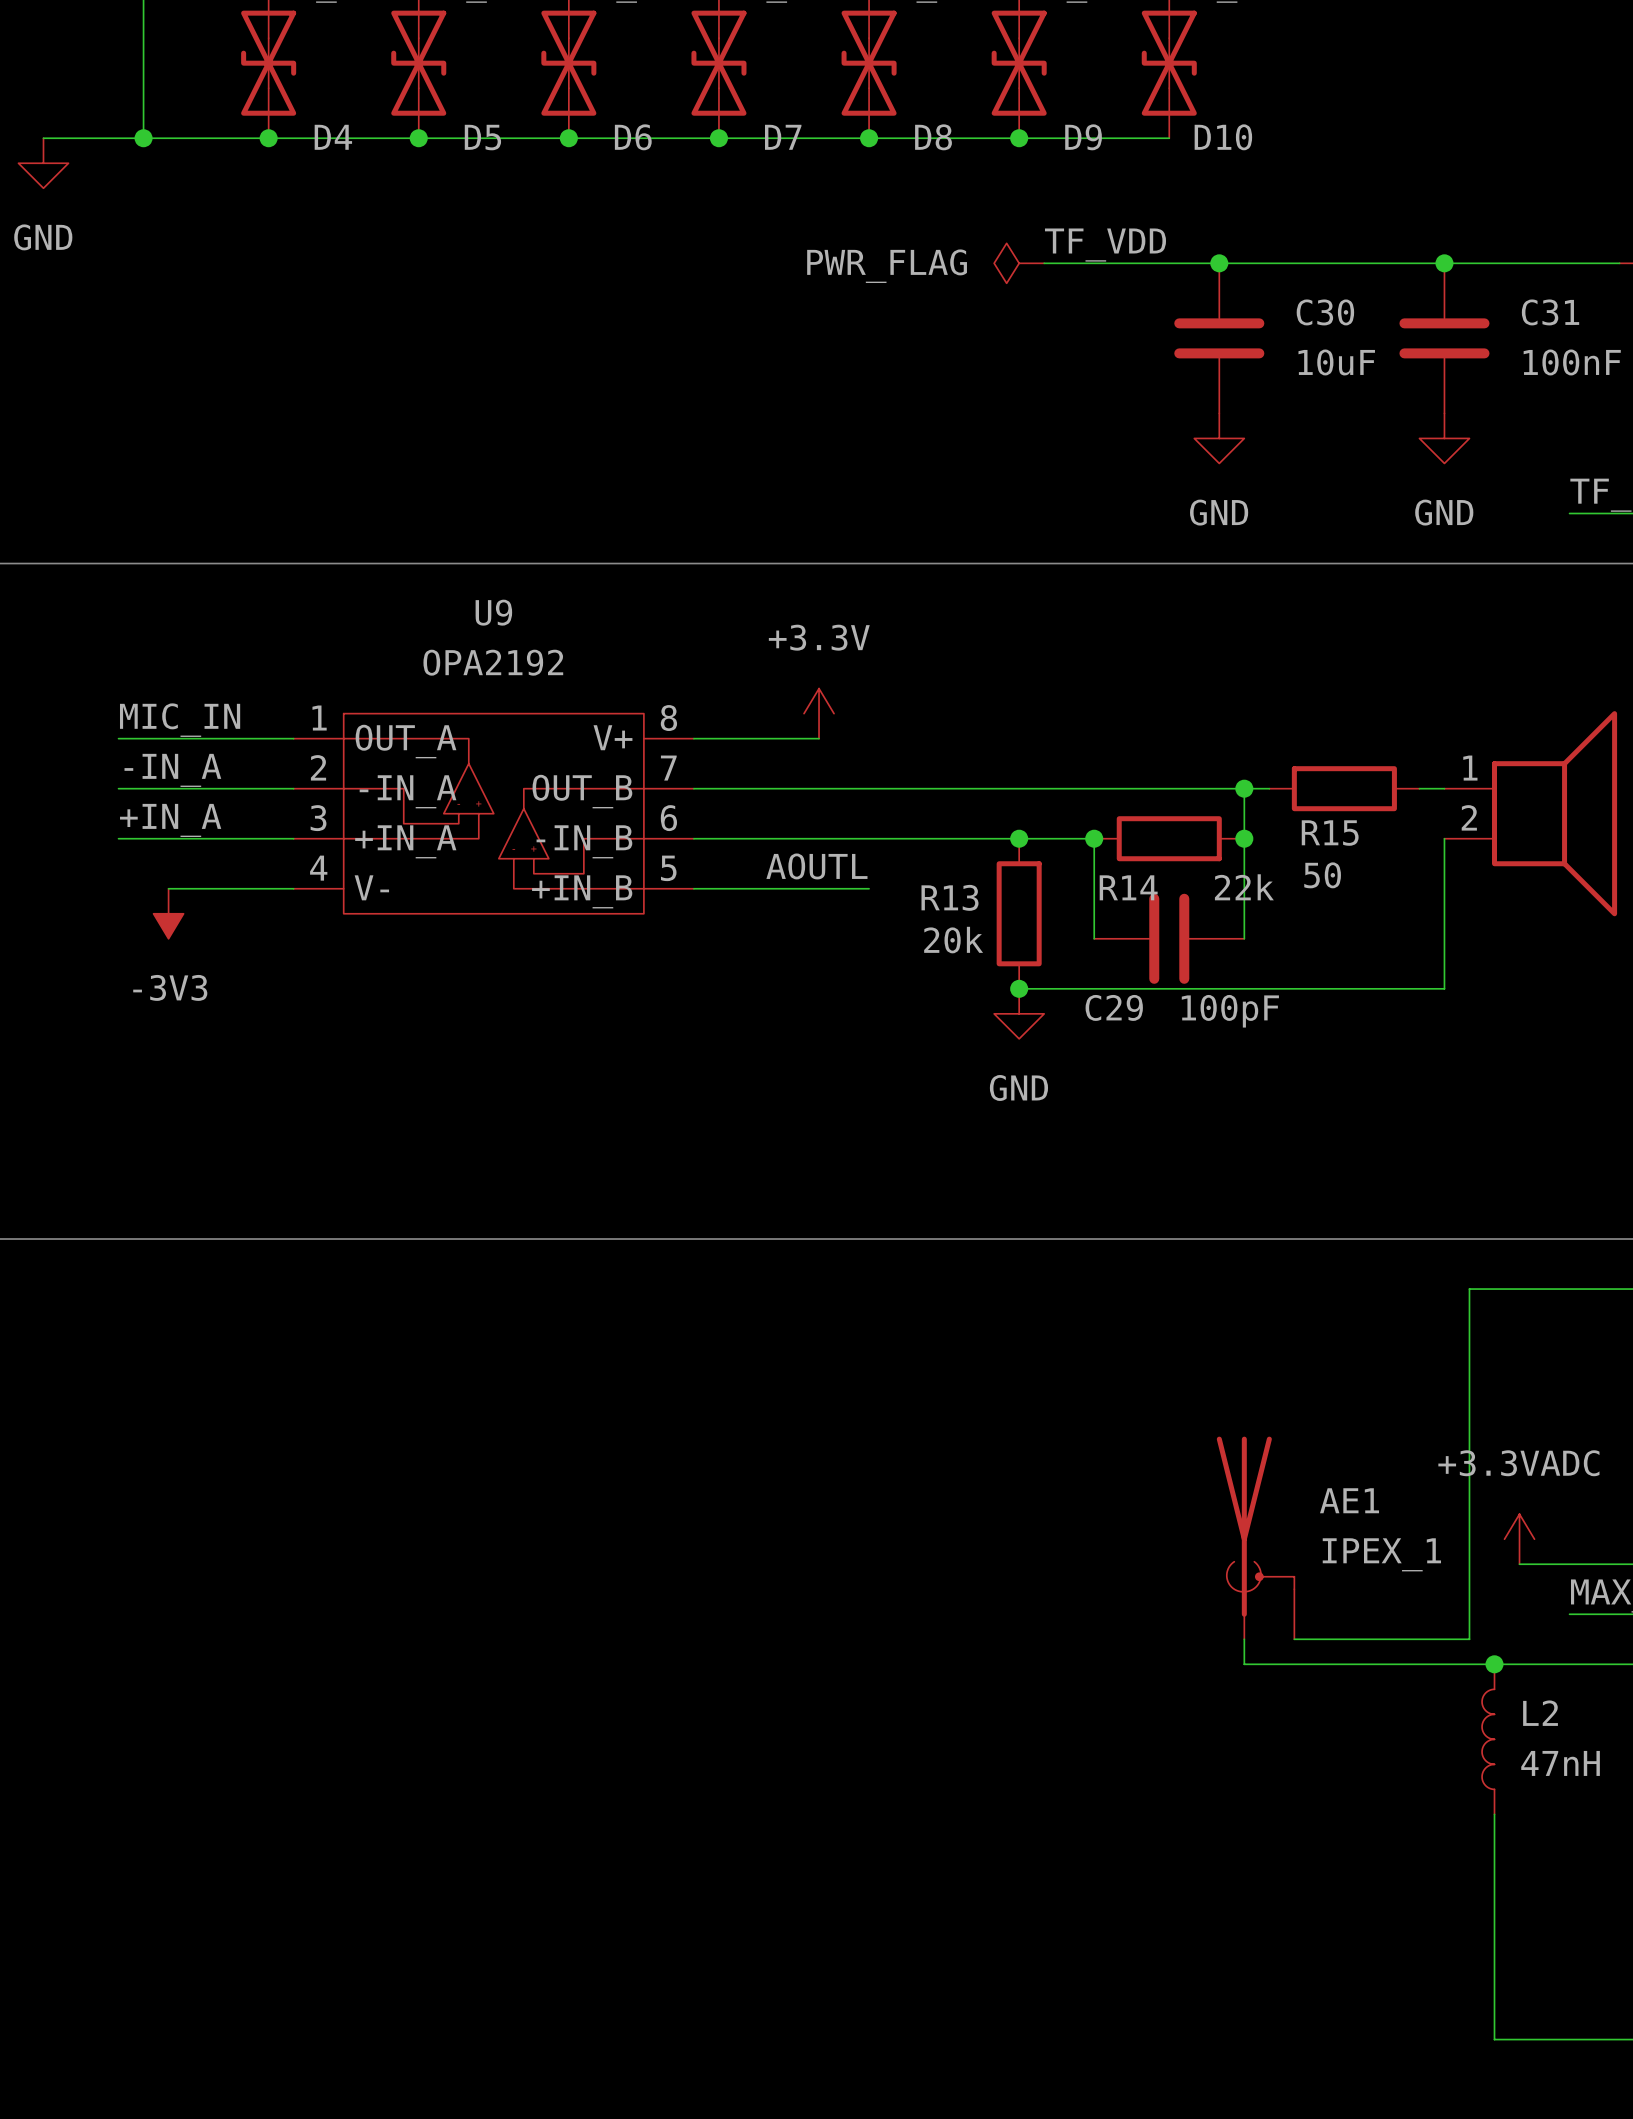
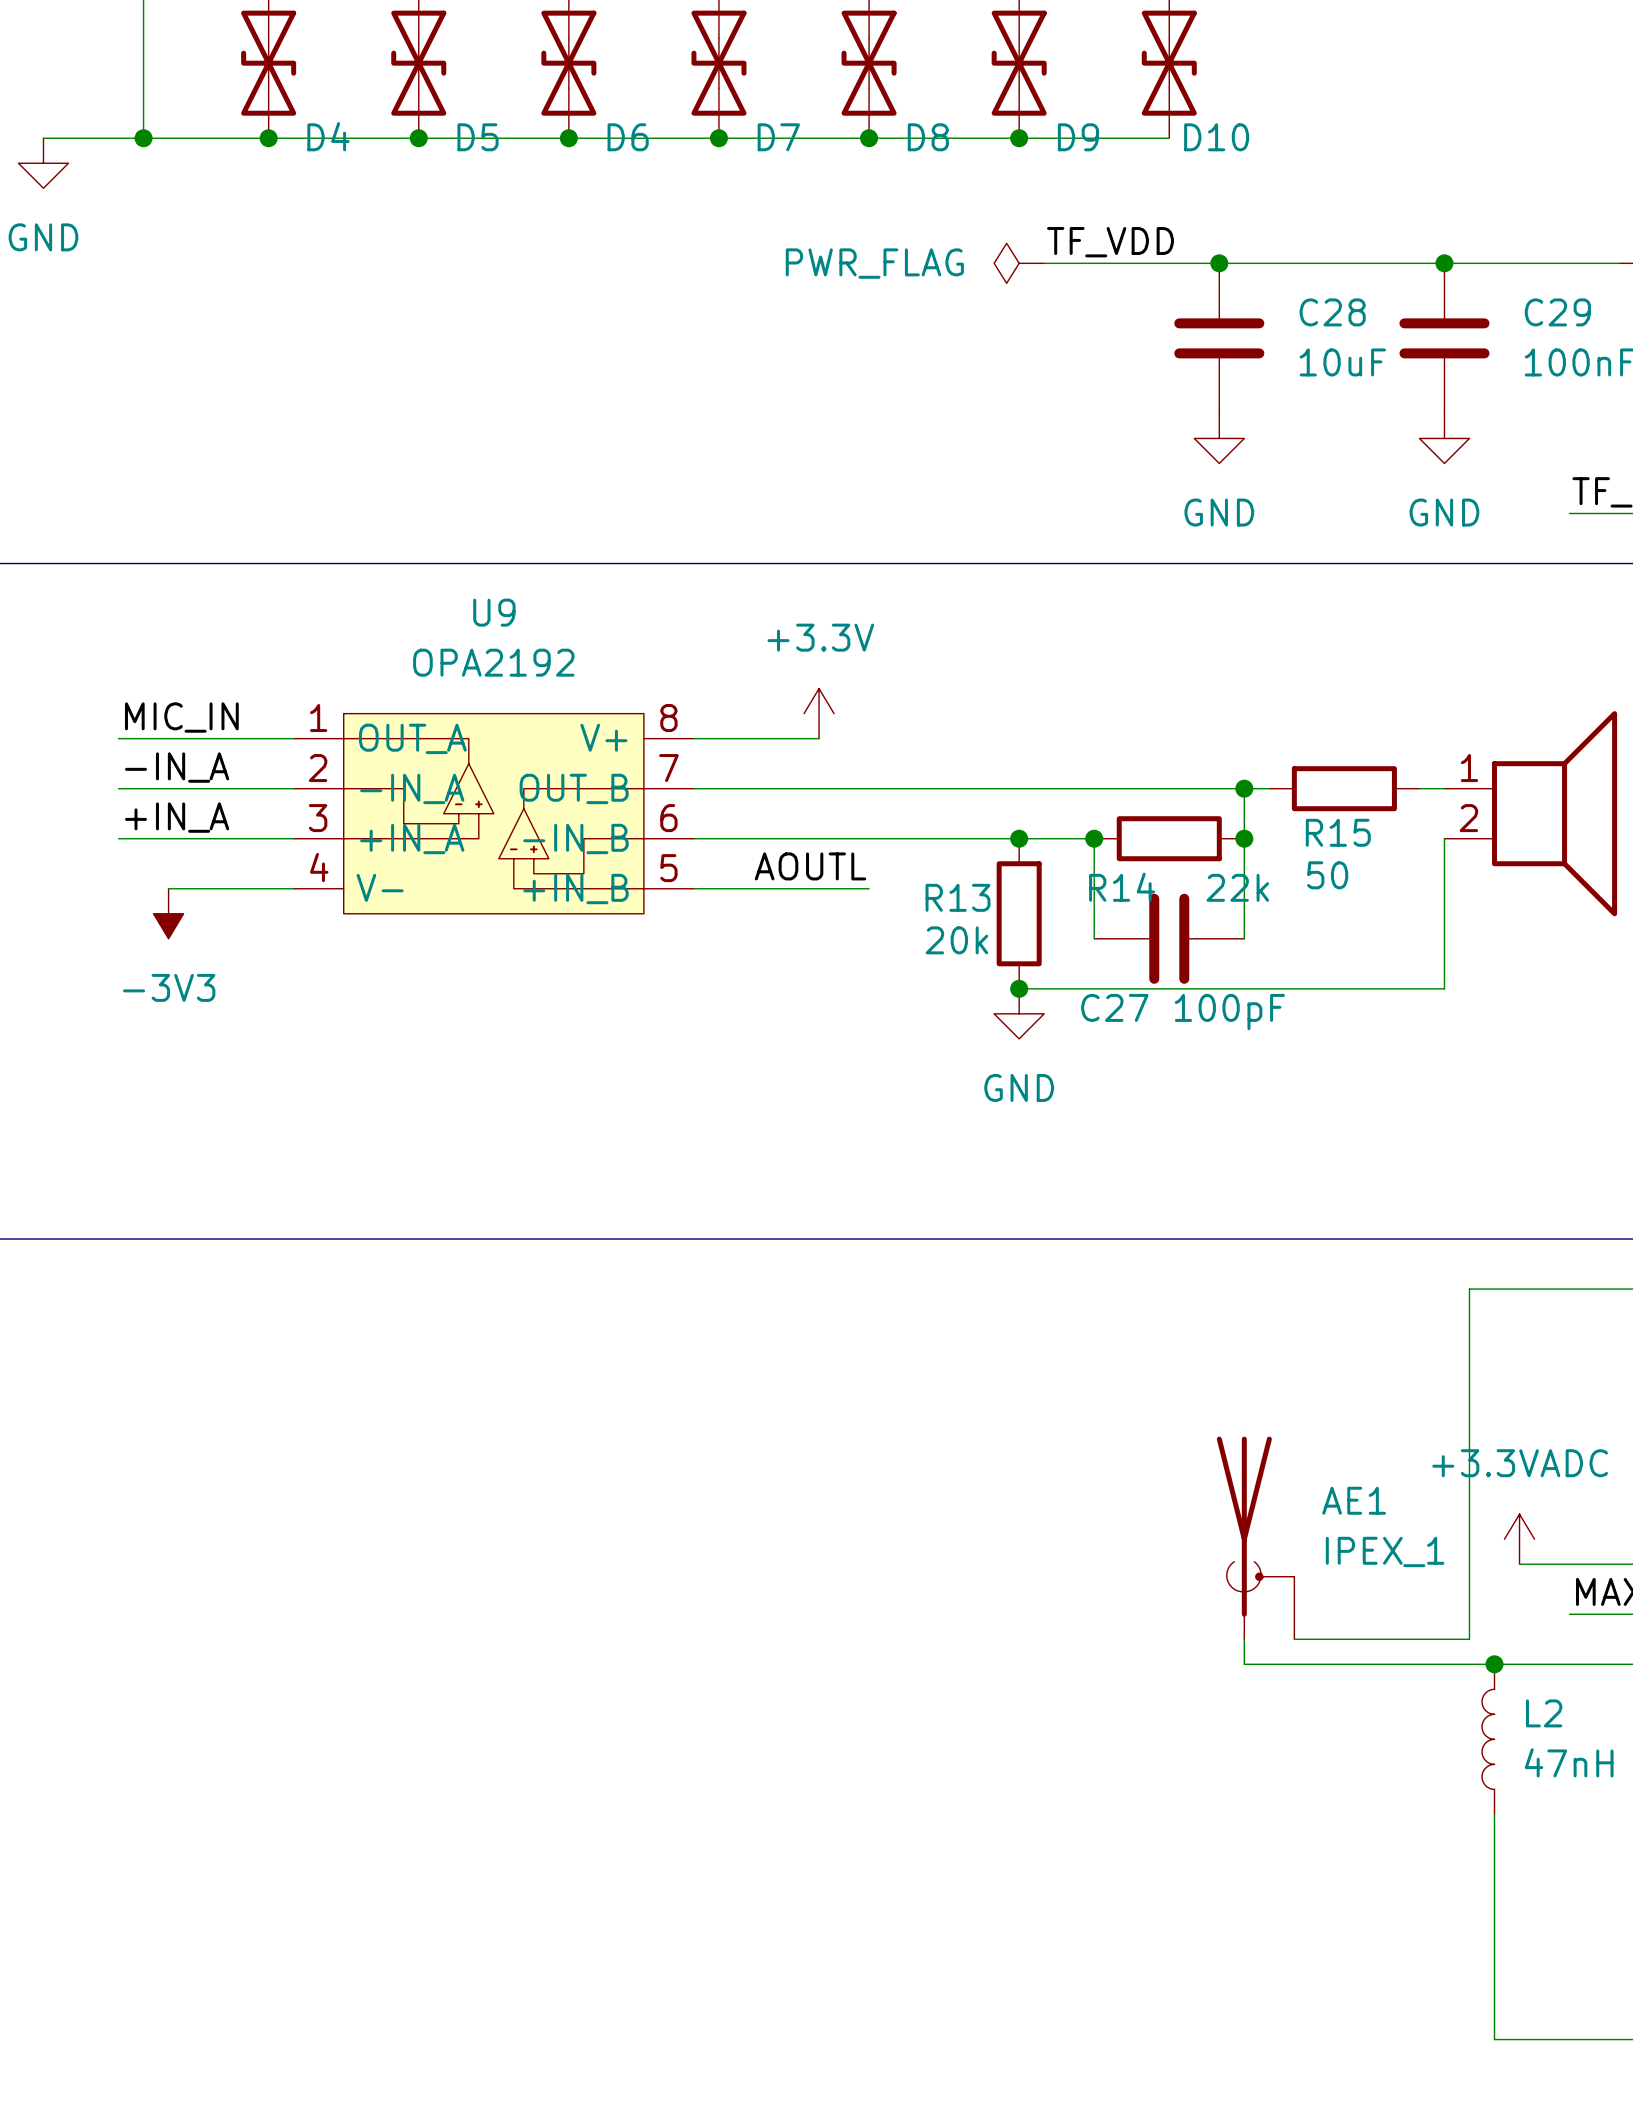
C30 name: C30 (1325, 312) -> C28 (1332, 312)
C31 name: C31 (1550, 312) -> C29 (1557, 312)
C29 name: C29 (1114, 1007) -> C27 (1114, 1007)

